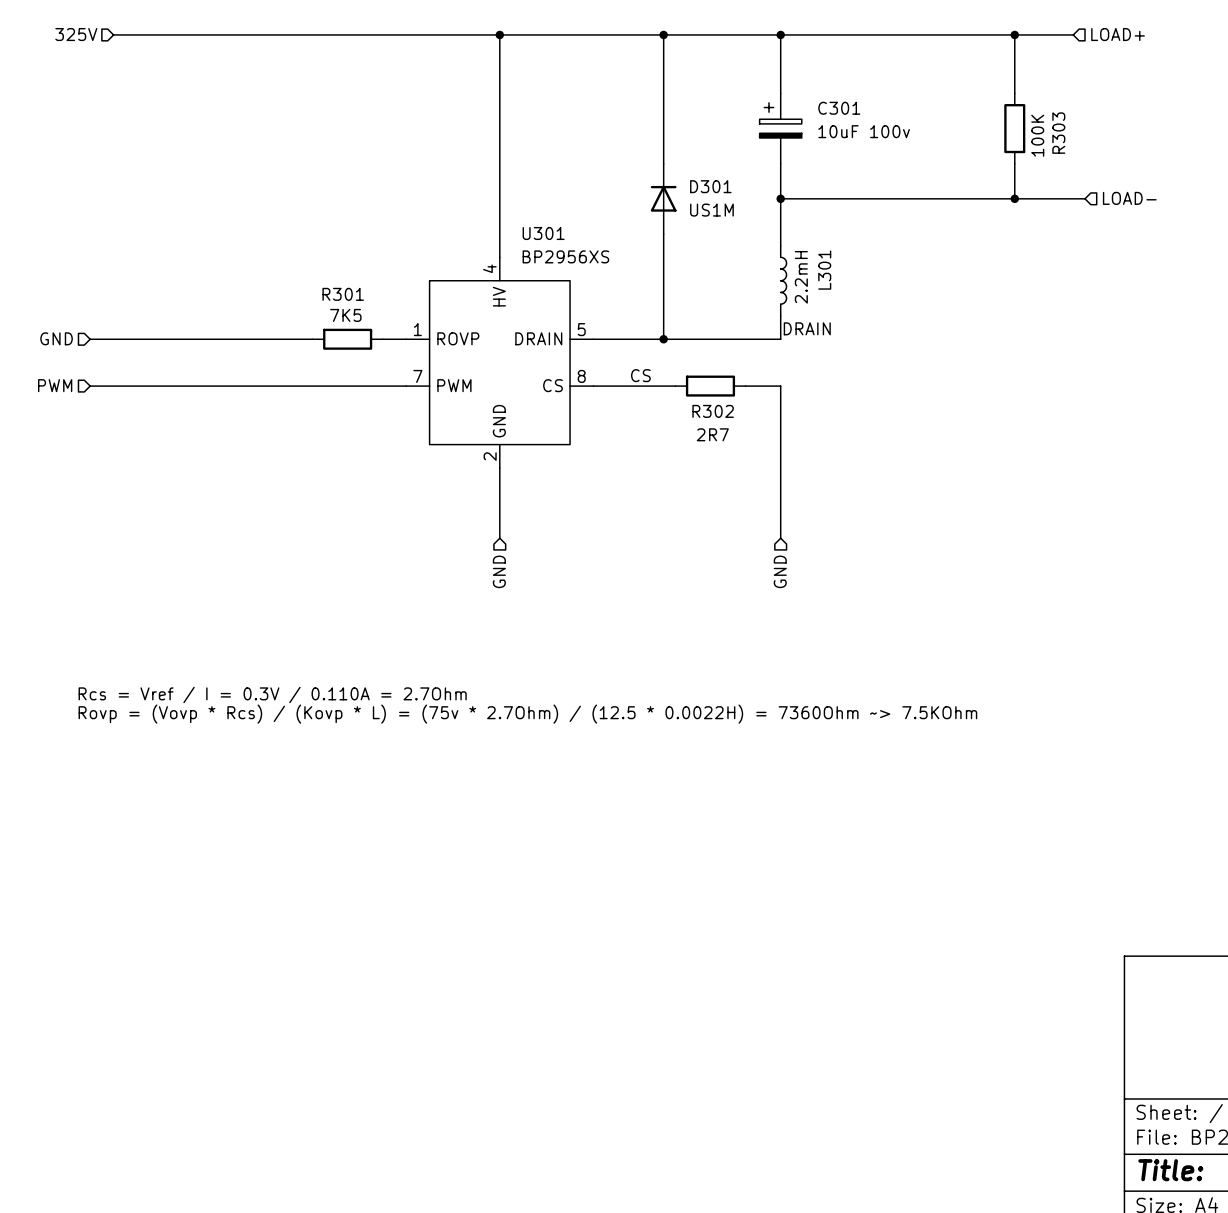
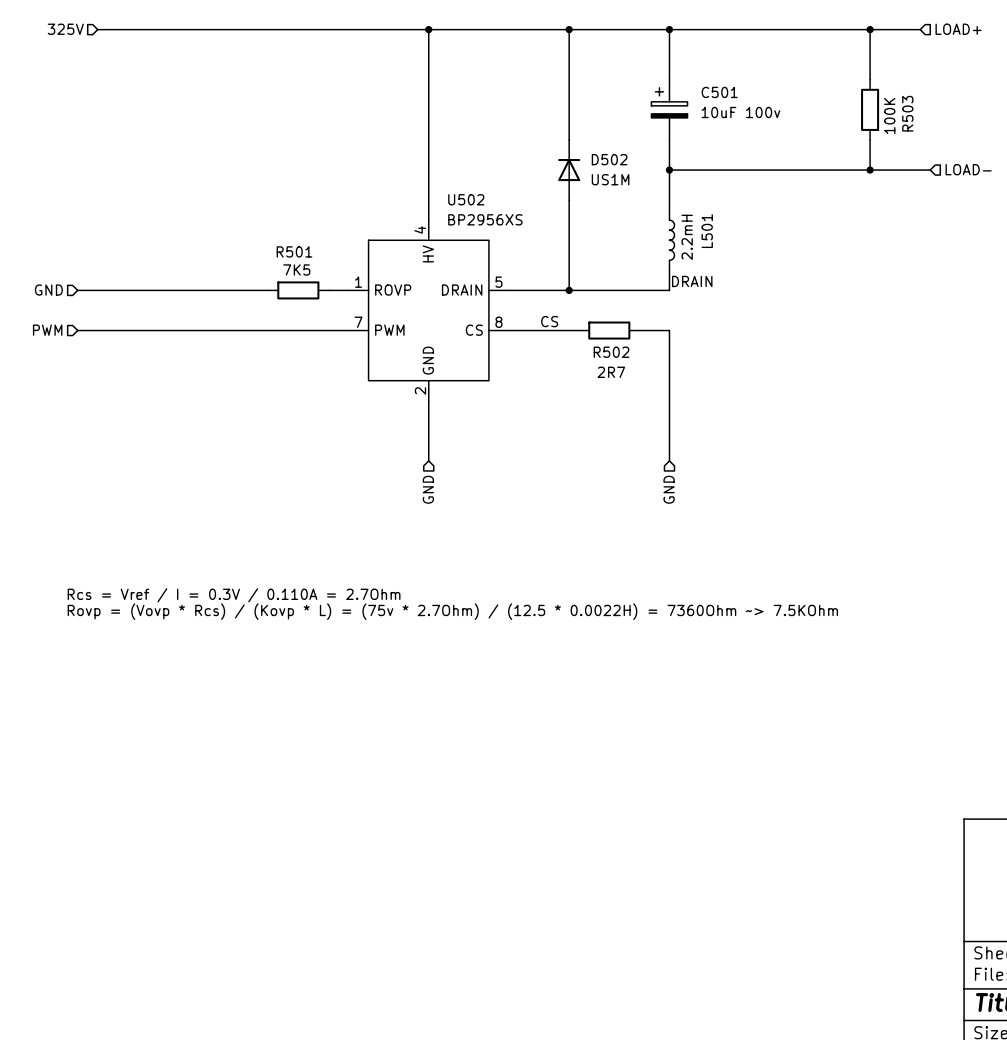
C301 name: C301 (839, 108) -> C501 (719, 92)
R303 name: R303 (1058, 133) -> R503 (907, 113)
D301 name: D301 (710, 186) -> D502 (609, 159)
U301 name: U301 (543, 233) -> U502 (466, 199)
L301 name: L301 (824, 270) -> L501 (707, 231)
R301 name: R301 (343, 294) -> R501 (294, 251)
R302 name: R302 (713, 411) -> R502 (611, 352)

